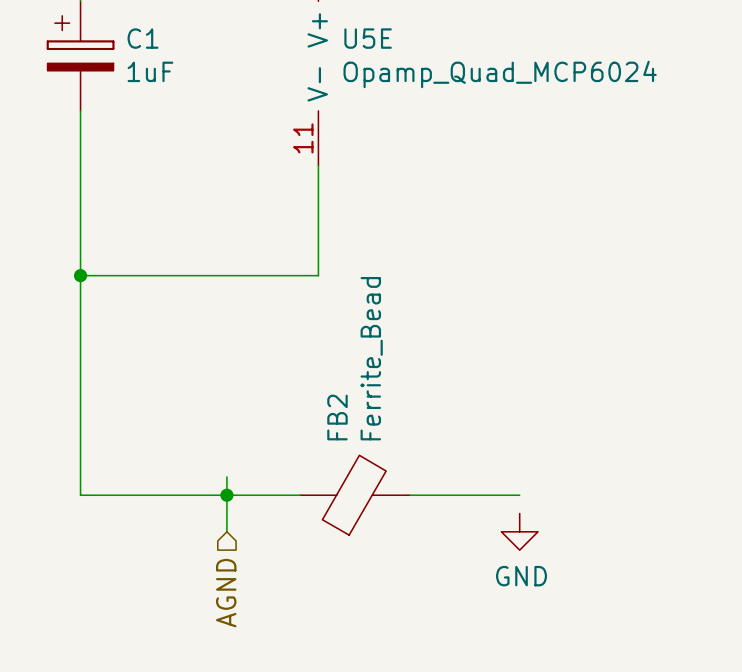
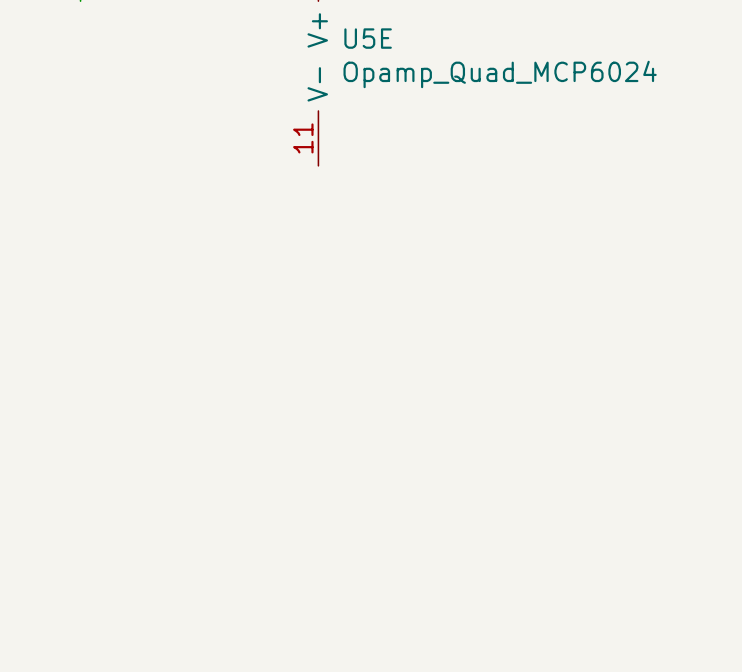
C1: 1uF (80, 56) -> none
wire: (80, 110) (80, 495) (300, 495) -> none
wire: (318, 165) (318, 275) (80, 275) -> none
junction: (80, 275) -> none
wire: (226, 476) (226, 531) -> none
junction: (226, 495) -> none
FB2: Ferrite_Bead (355, 495) -> none
wire: (409, 495) (519, 495) -> none
power symbol: GND (519, 531) -> none
hierarchical label: AGND (226, 593) -> none

